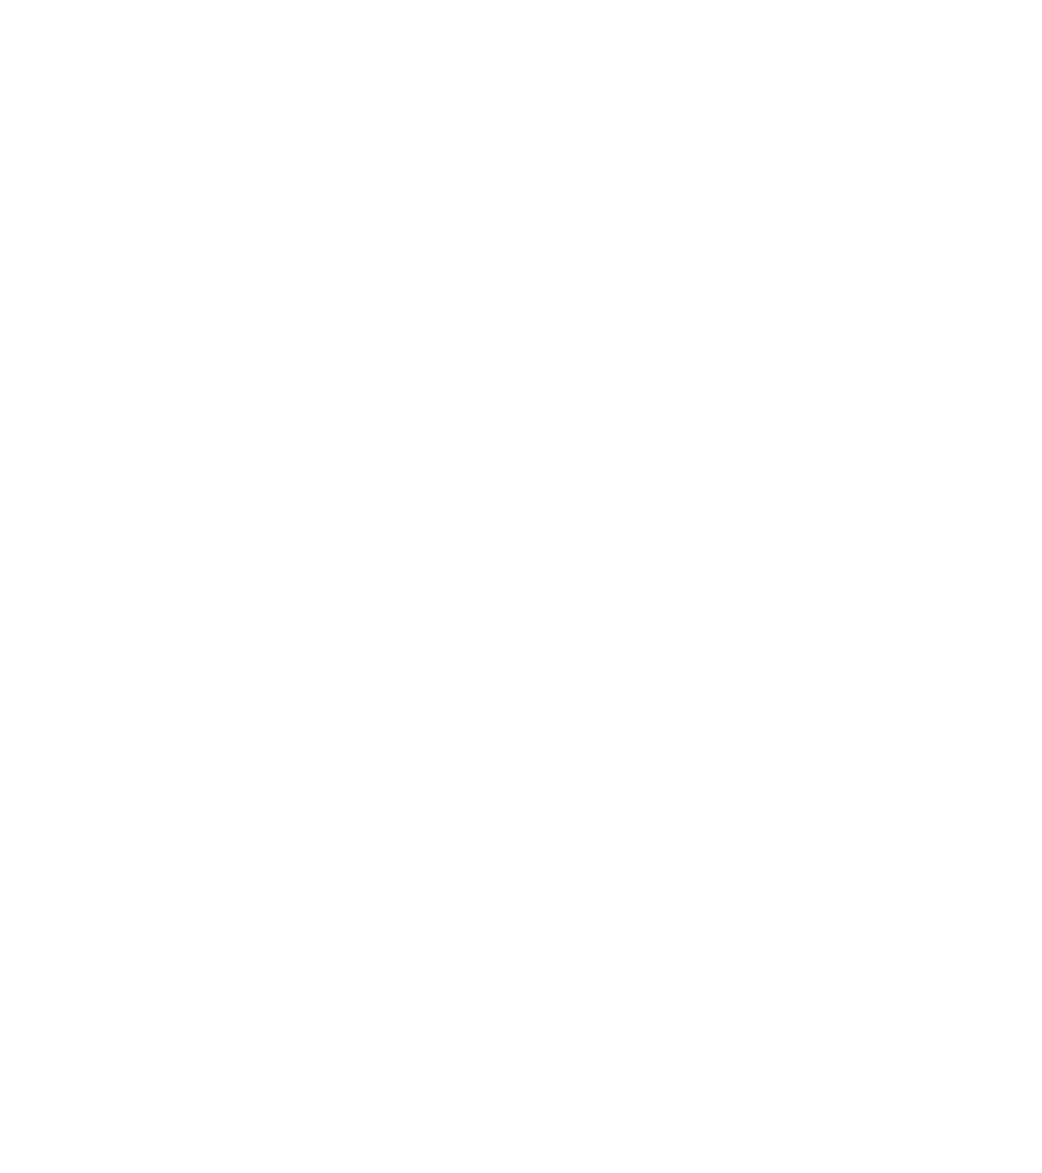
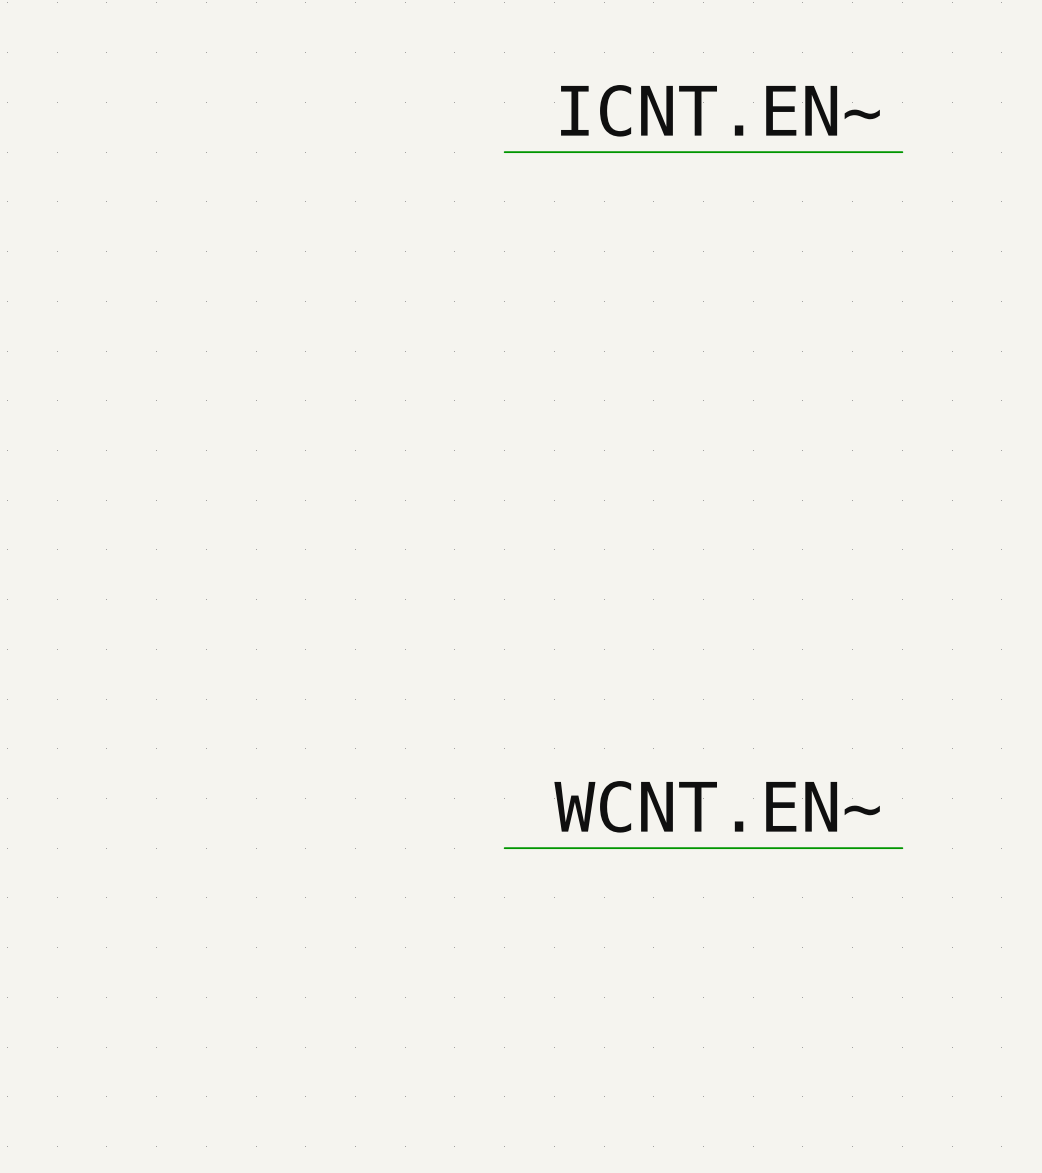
label: none -> ICNT.EN~ (720, 110)
wire: none -> (504, 152) (902, 152)
label: none -> WCNT.EN~ (717, 806)
wire: none -> (504, 848) (902, 848)

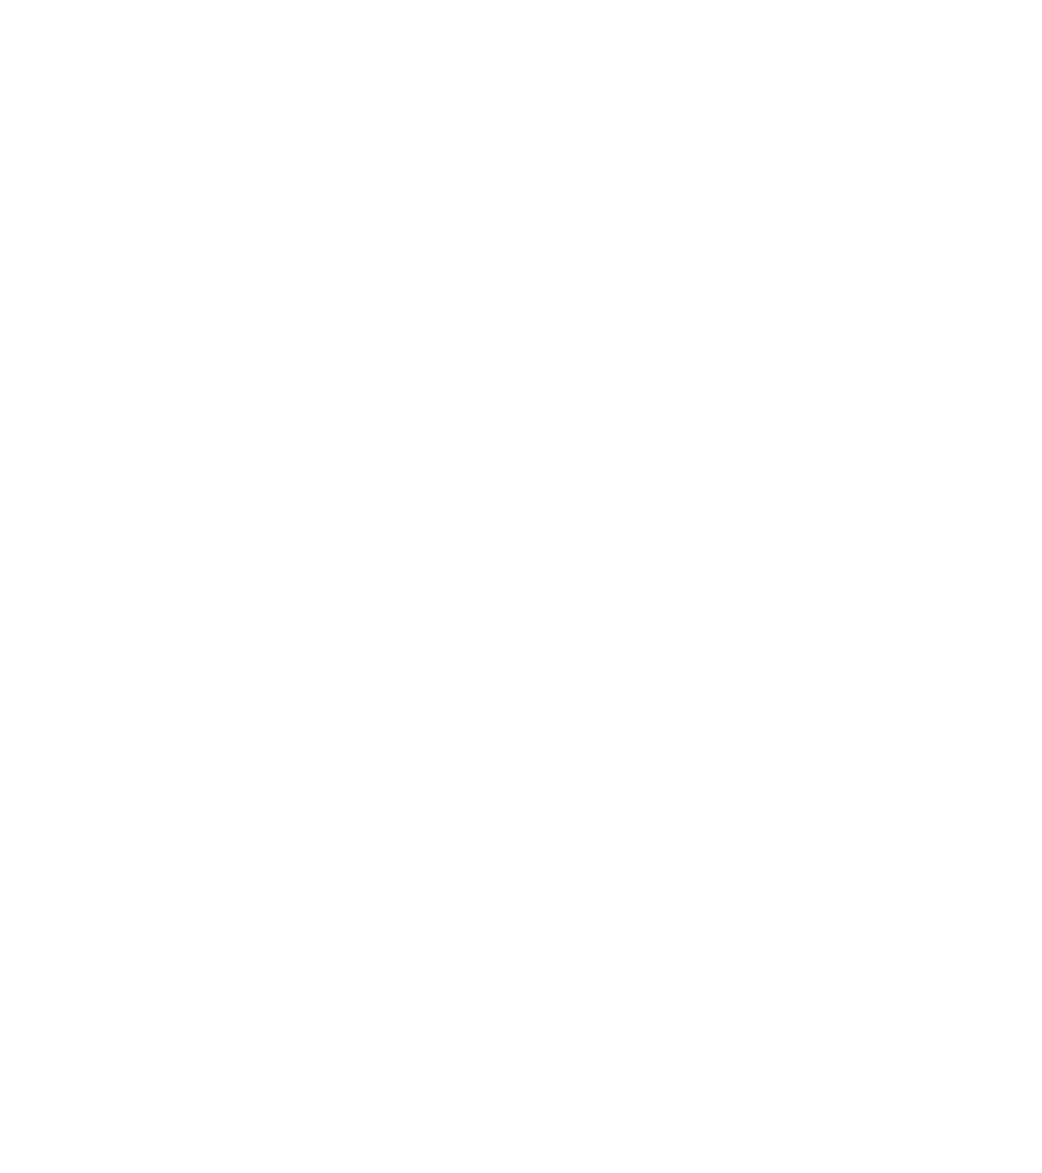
label: ICNT.EN~ (720, 110) -> none
wire: (504, 152) (902, 152) -> none
label: WCNT.EN~ (717, 806) -> none
wire: (504, 848) (902, 848) -> none

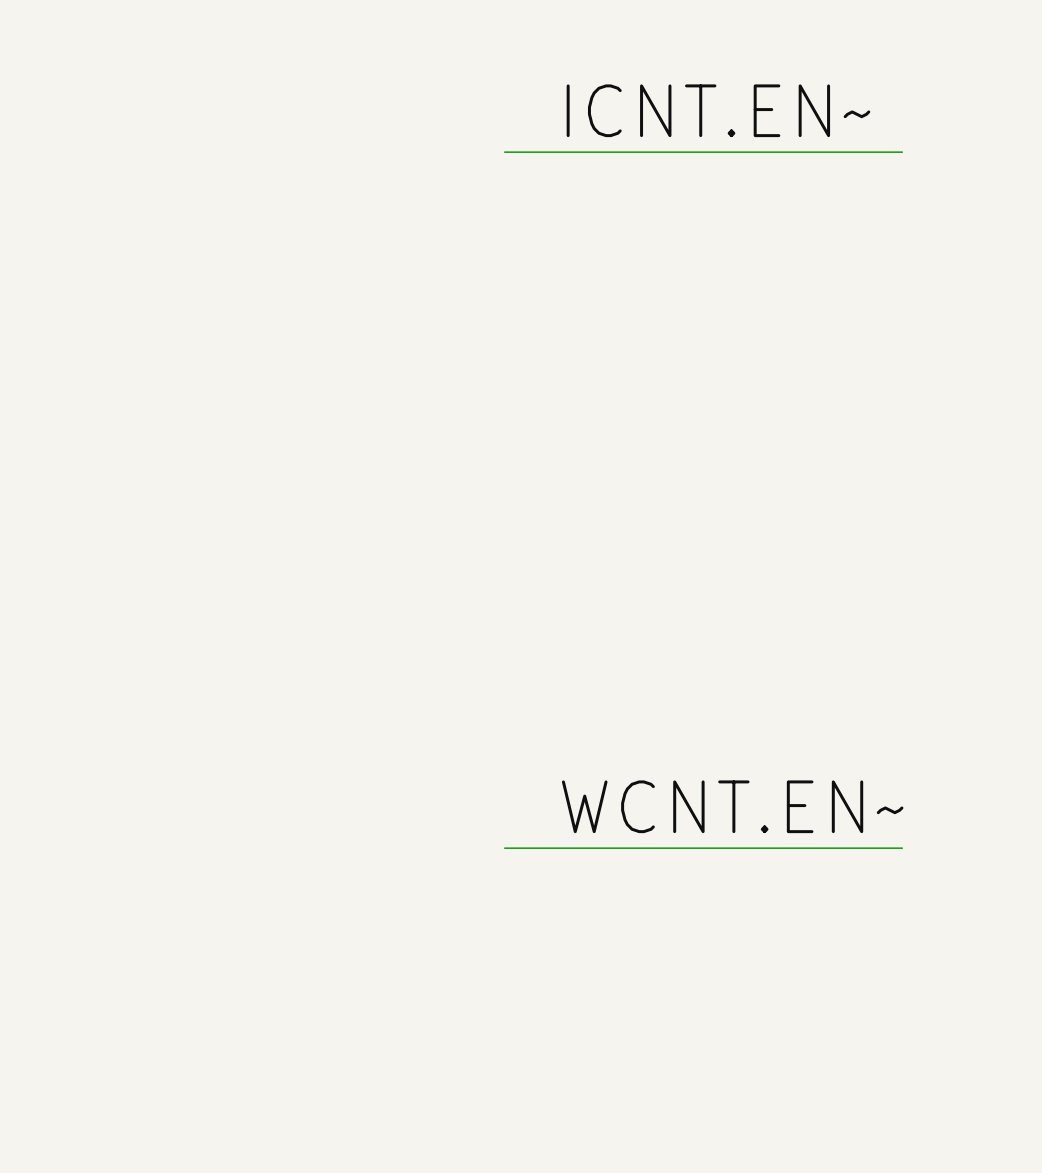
label: none -> ICNT.EN~ (718, 110)
wire: none -> (504, 152) (902, 152)
label: none -> WCNT.EN~ (732, 806)
wire: none -> (504, 848) (902, 848)

